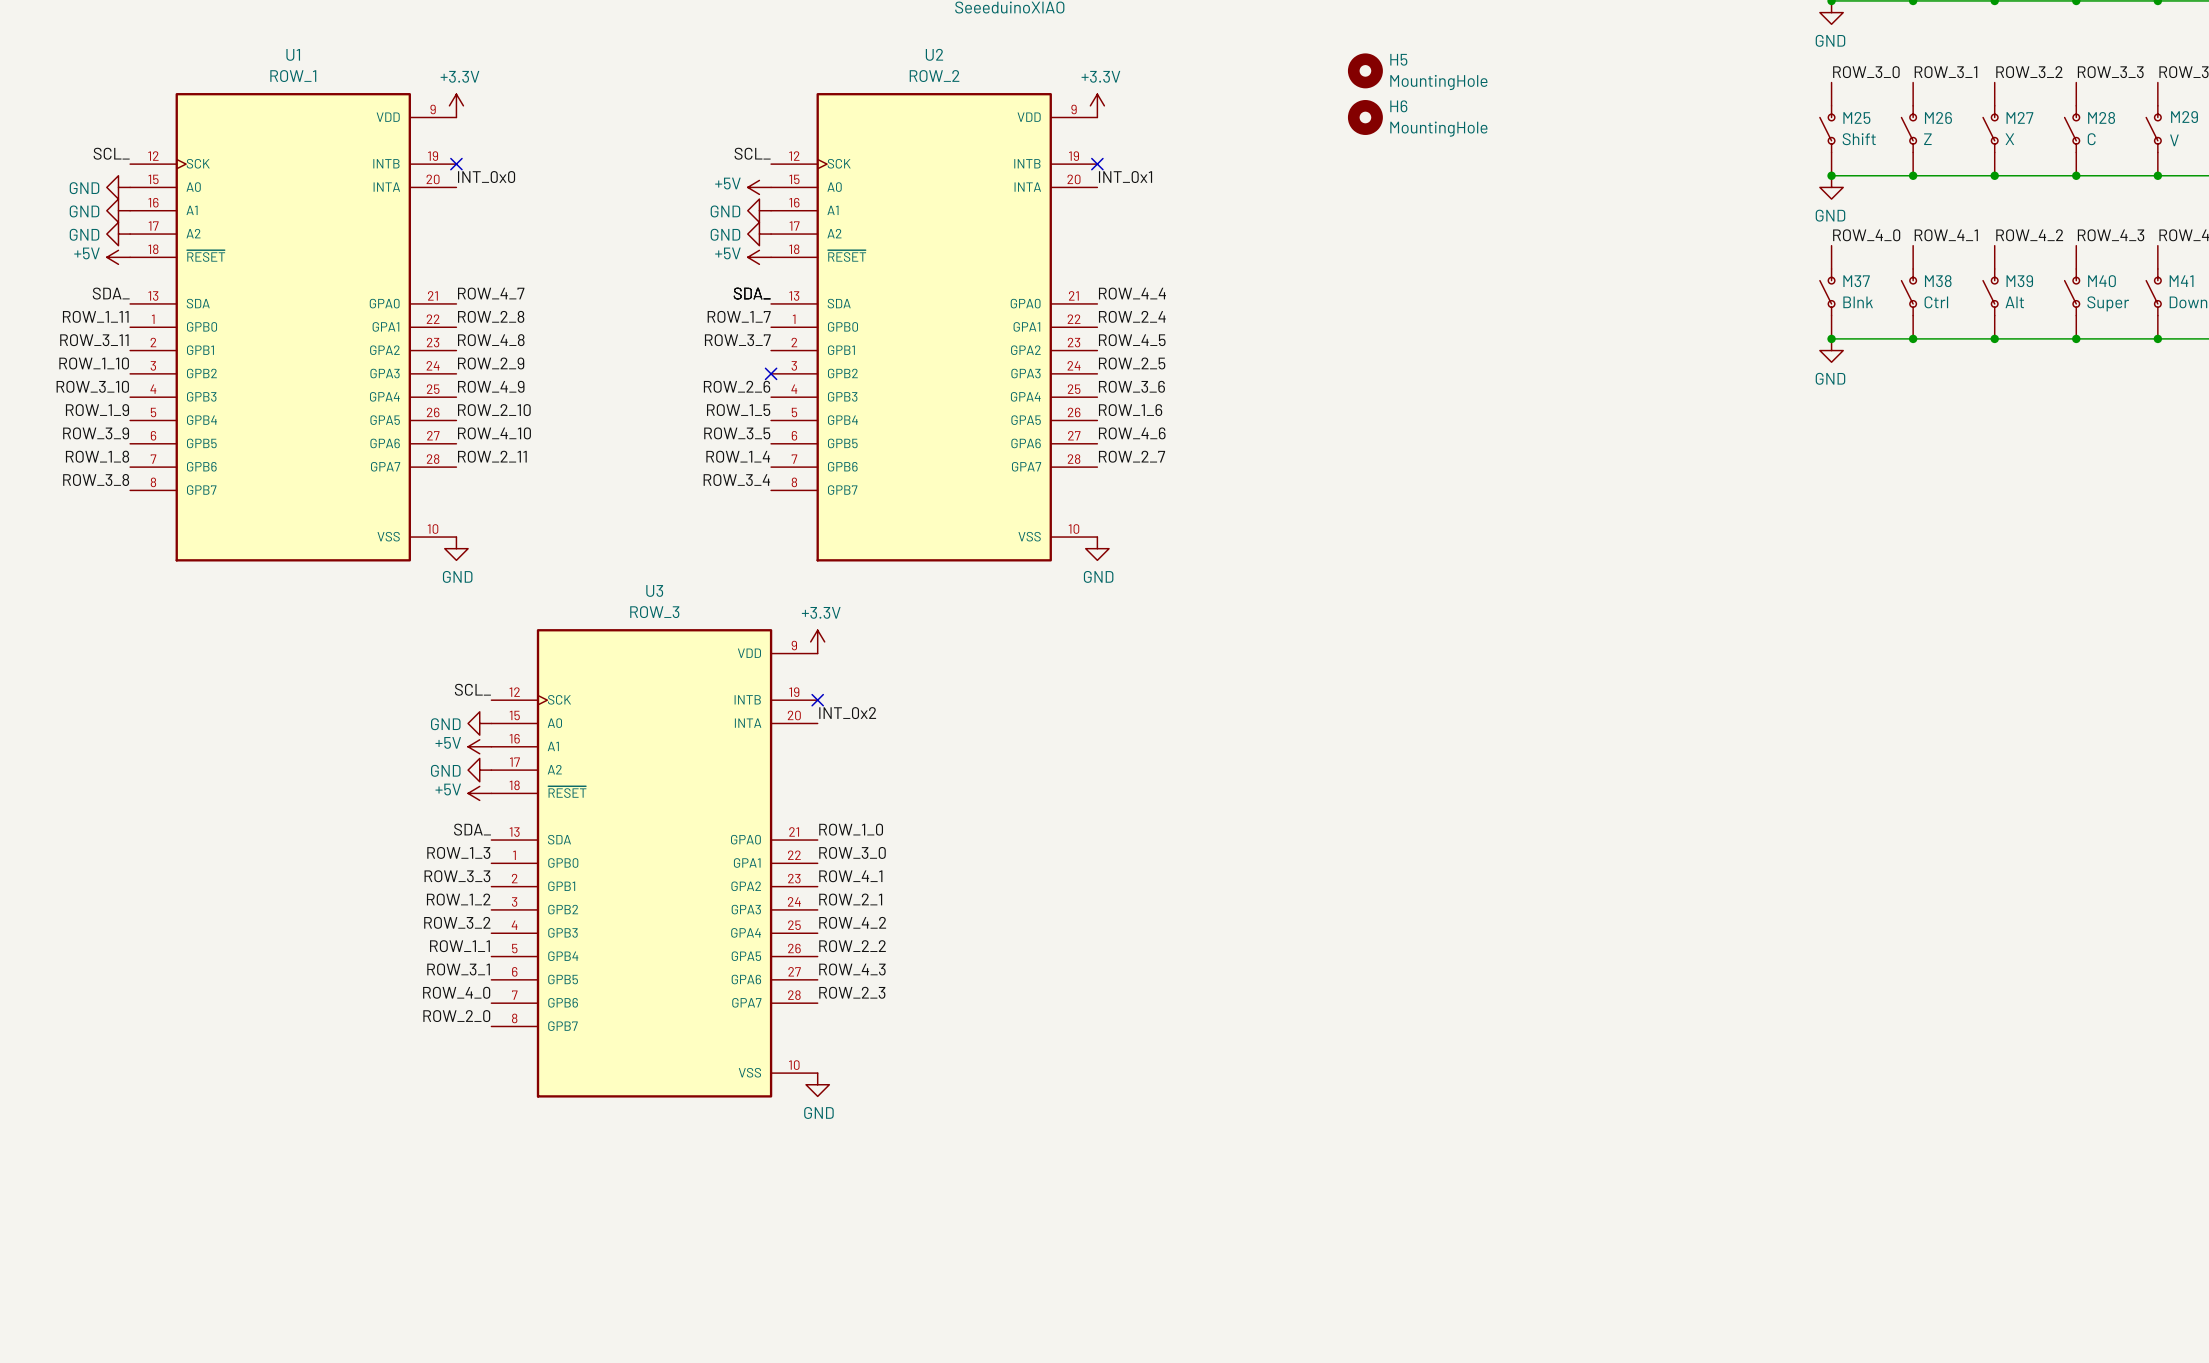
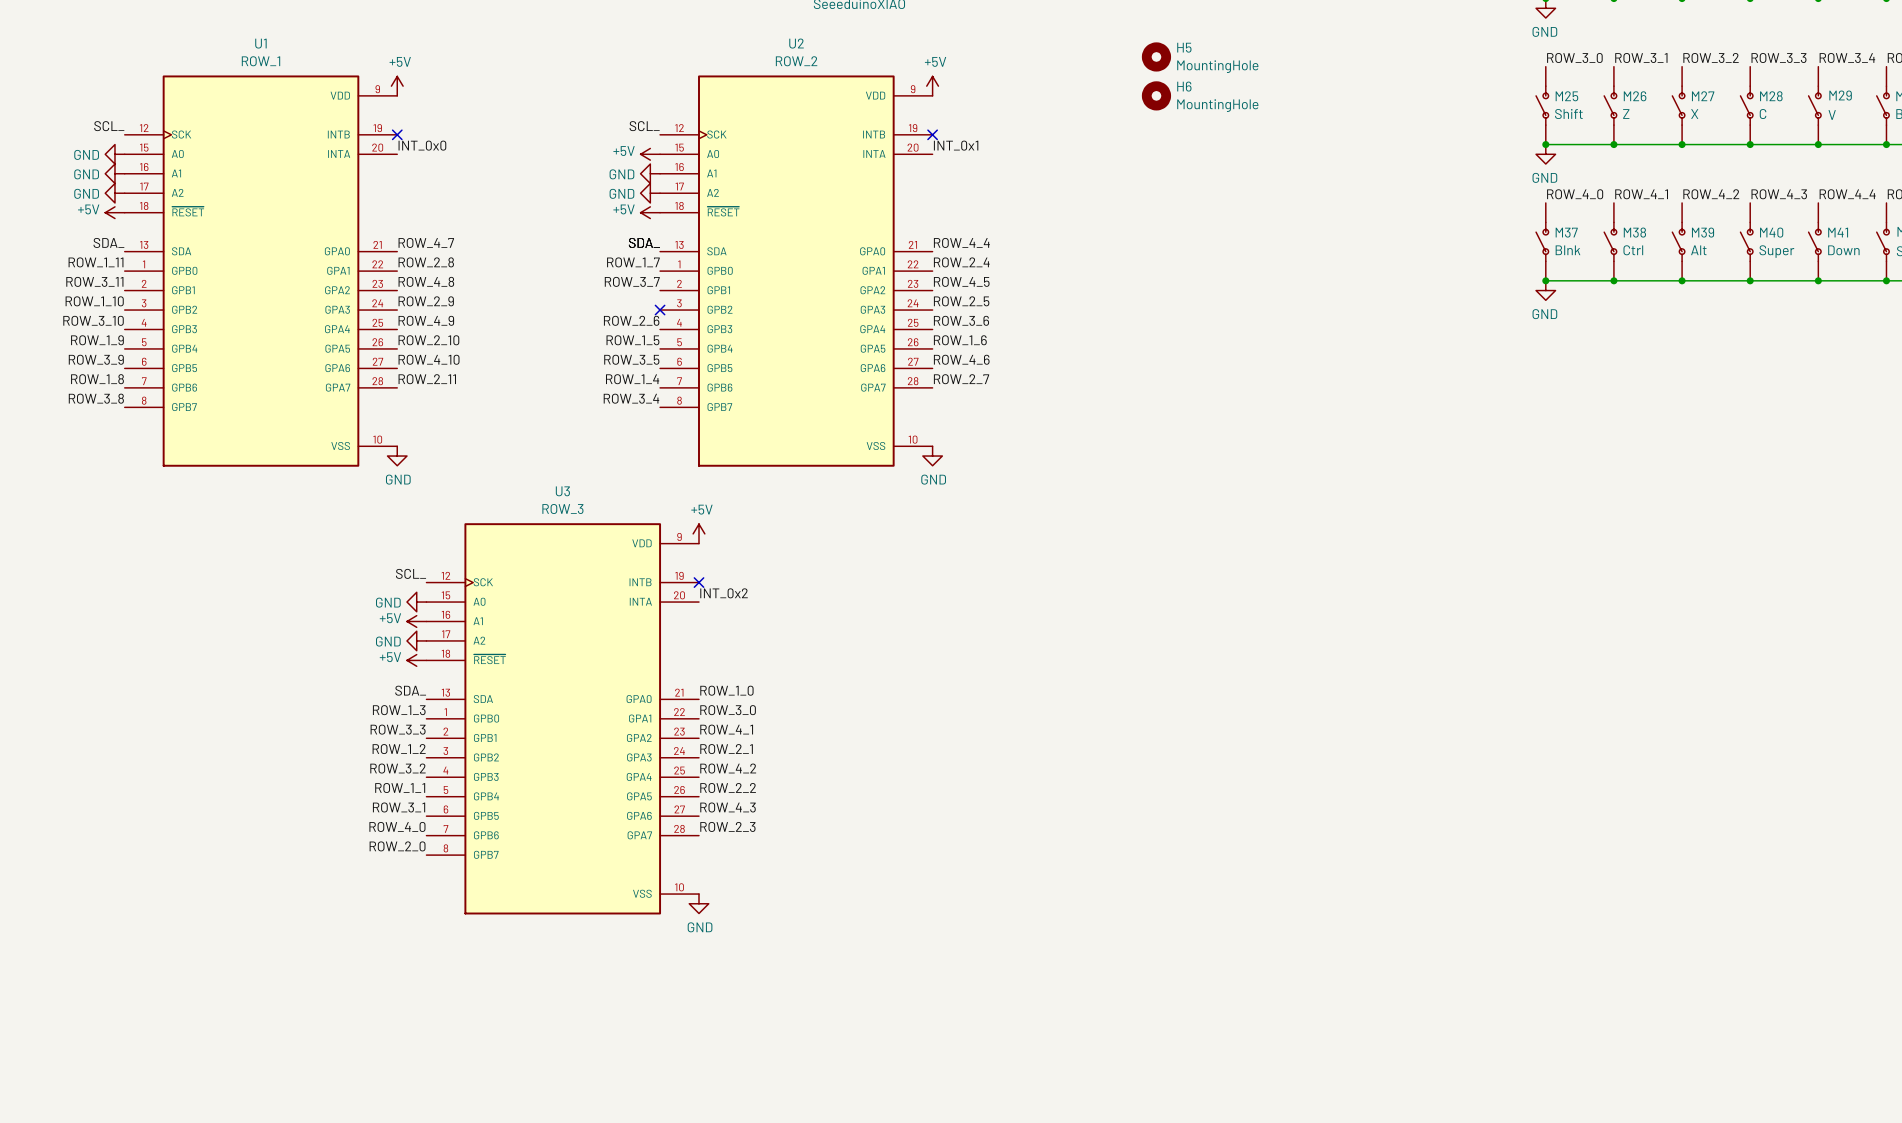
power symbol: +3.3V (456, 105) -> +5V (397, 86)
power symbol: +3.3V (1097, 105) -> +5V (932, 86)
power symbol: +3.3V (817, 641) -> +5V (698, 533)

